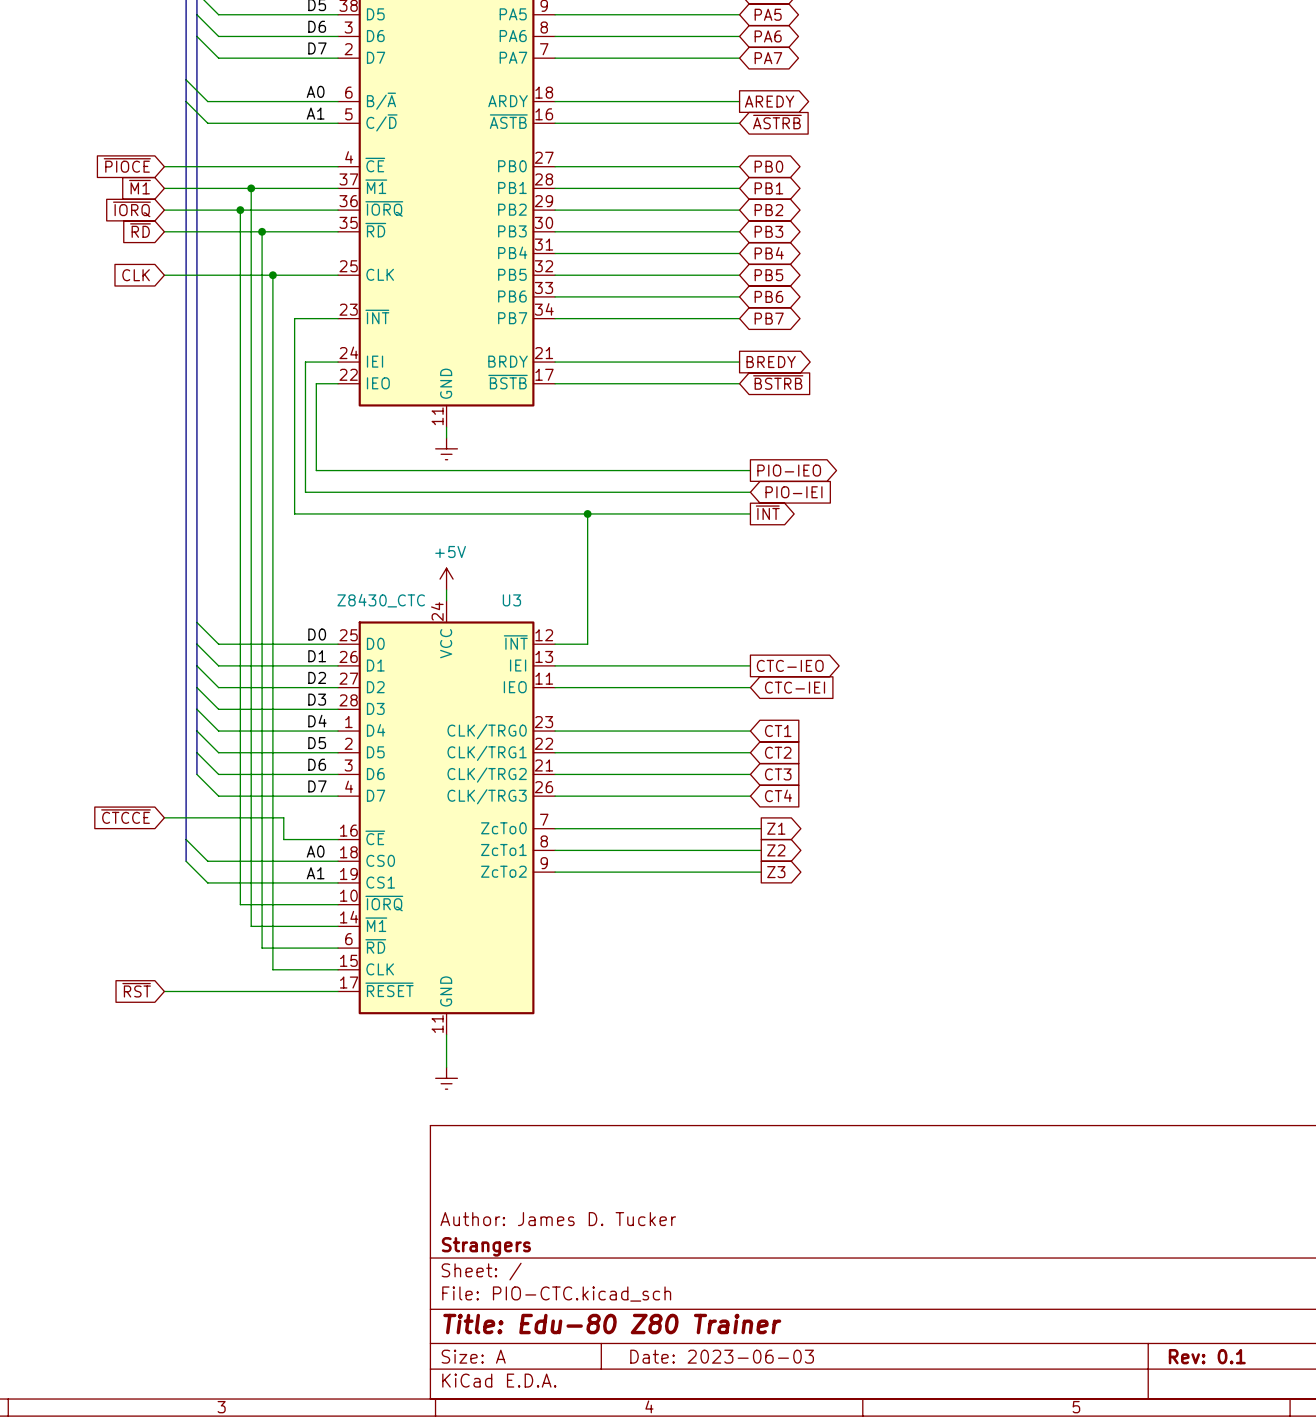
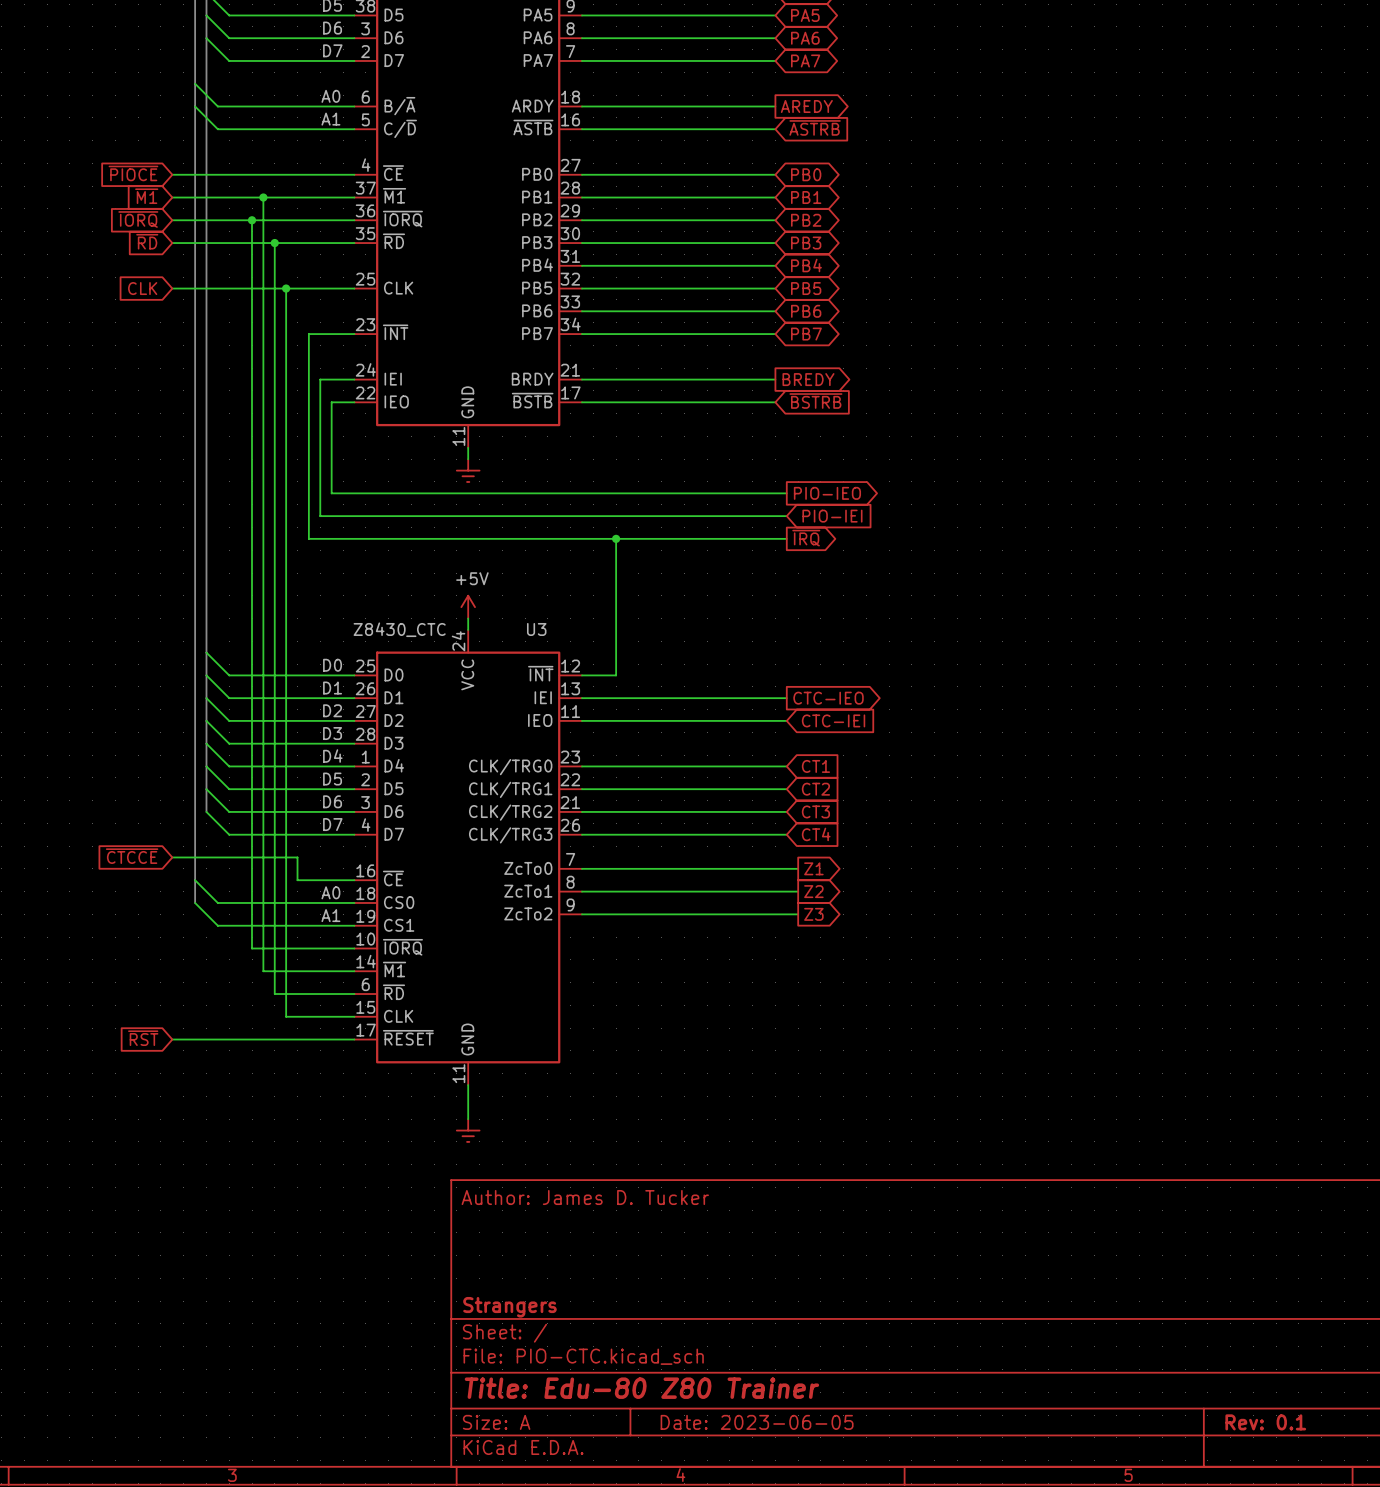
global label: ~{INT} (767, 512) -> ~{IRQ} (806, 538)
title block position: Author: James D. Tucker (558, 1219) -> Author: James D. Tucker (585, 1197)
title block: Date: 2023-06-03 (722, 1356) -> Date: 2023-06-05 (757, 1422)

